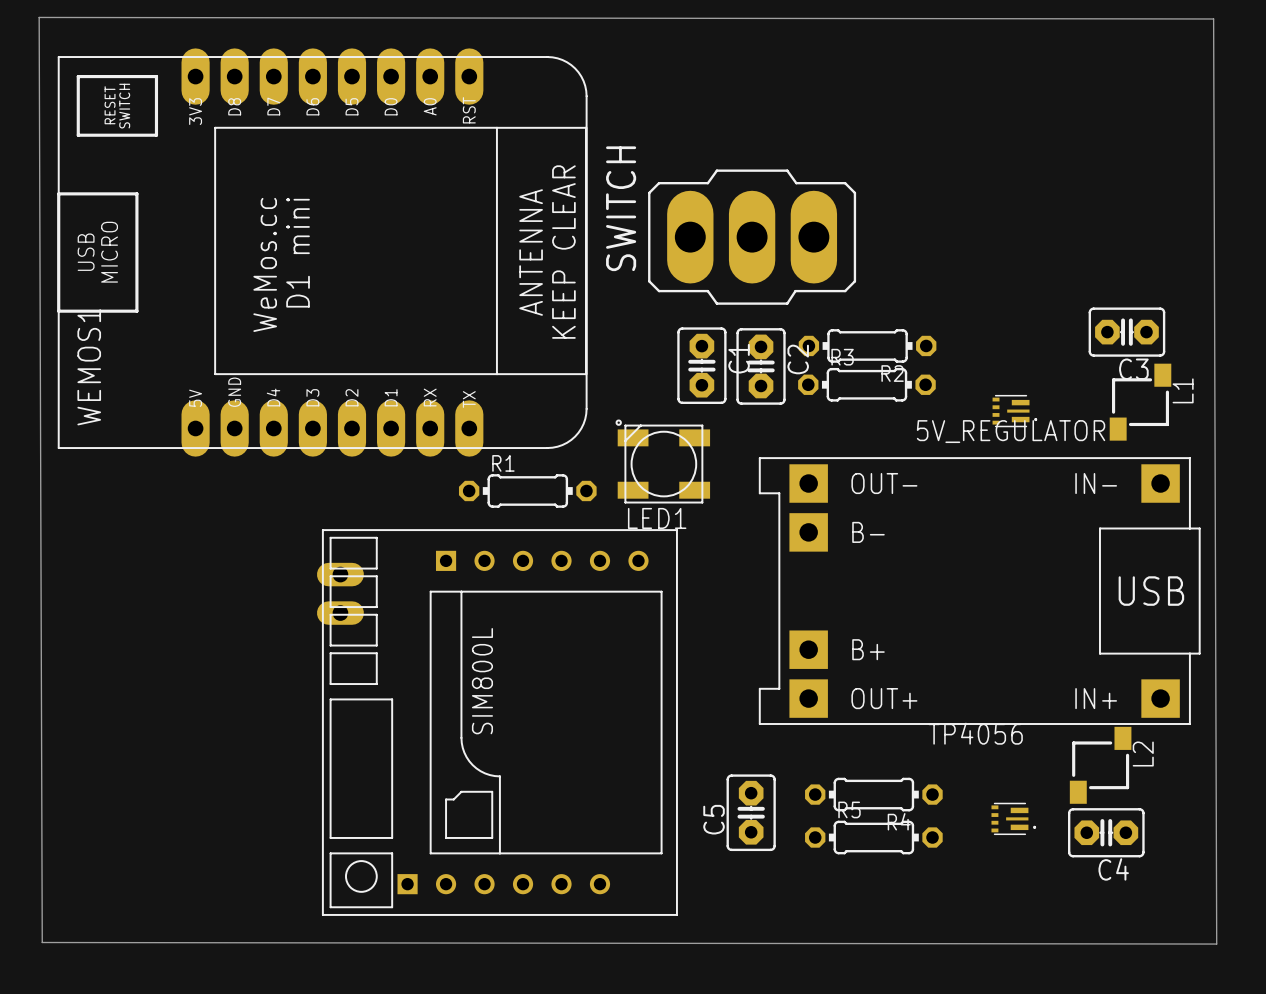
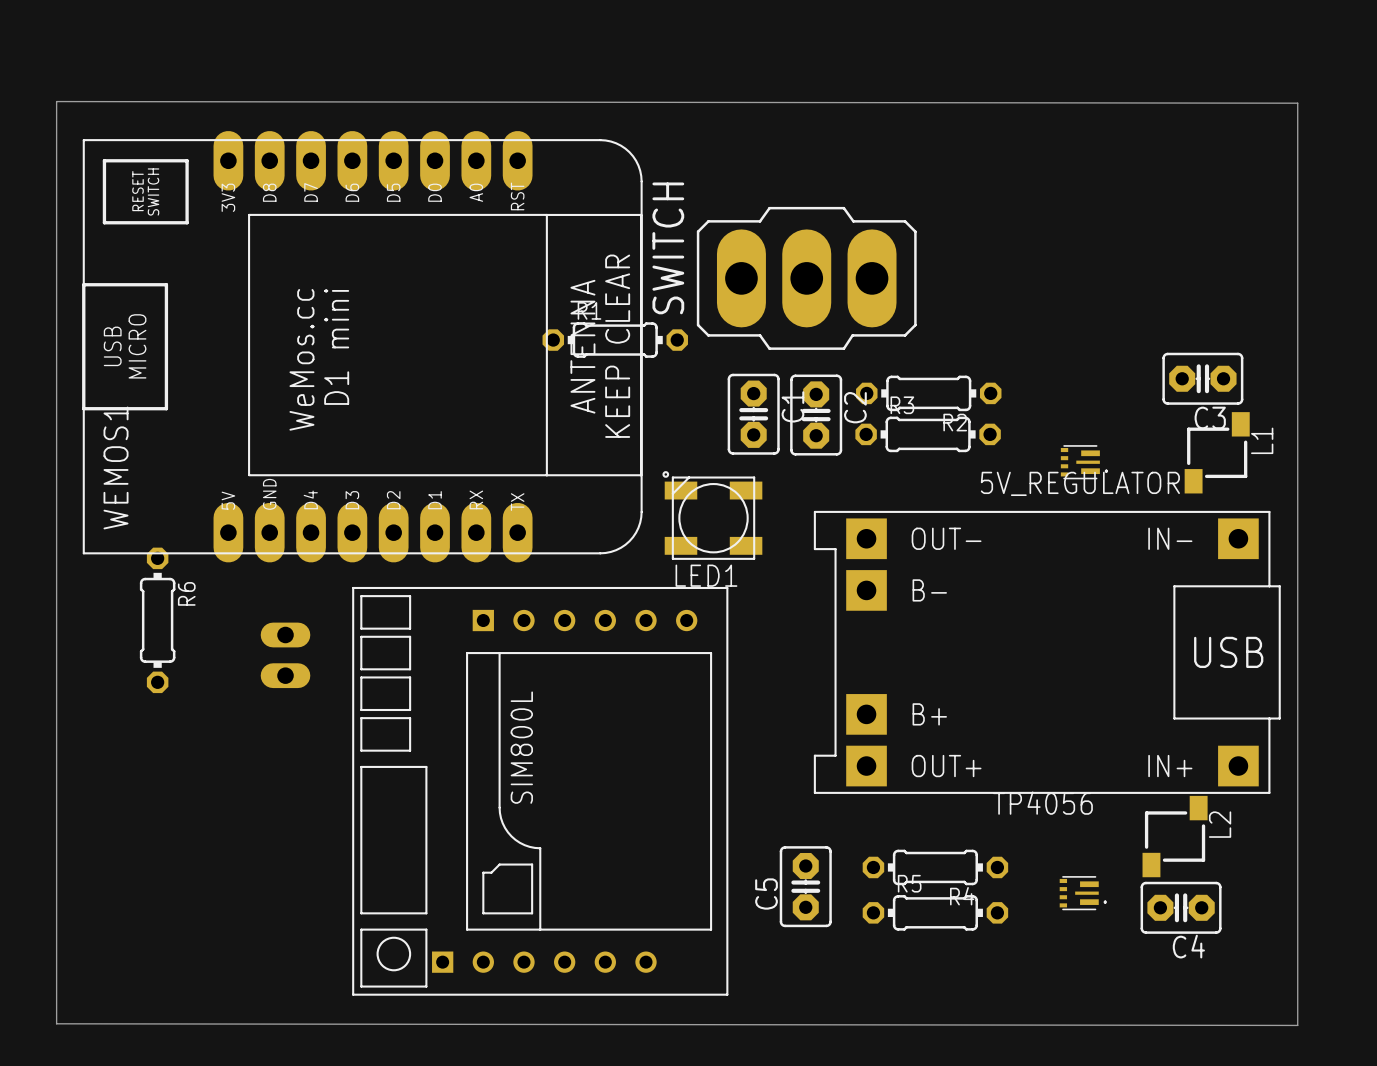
WEMOS1 position: (322, 252) -> (362, 346)
R1 position: (527, 490) -> (615, 340)
R6: none -> (157, 620)
part position: (340, 593) -> (285, 655)
board edge: (42, 942) (39, 17) (1213, 18) (1216, 944) -> (56, 1023) (56, 101) (1297, 103) (1297, 1025)

